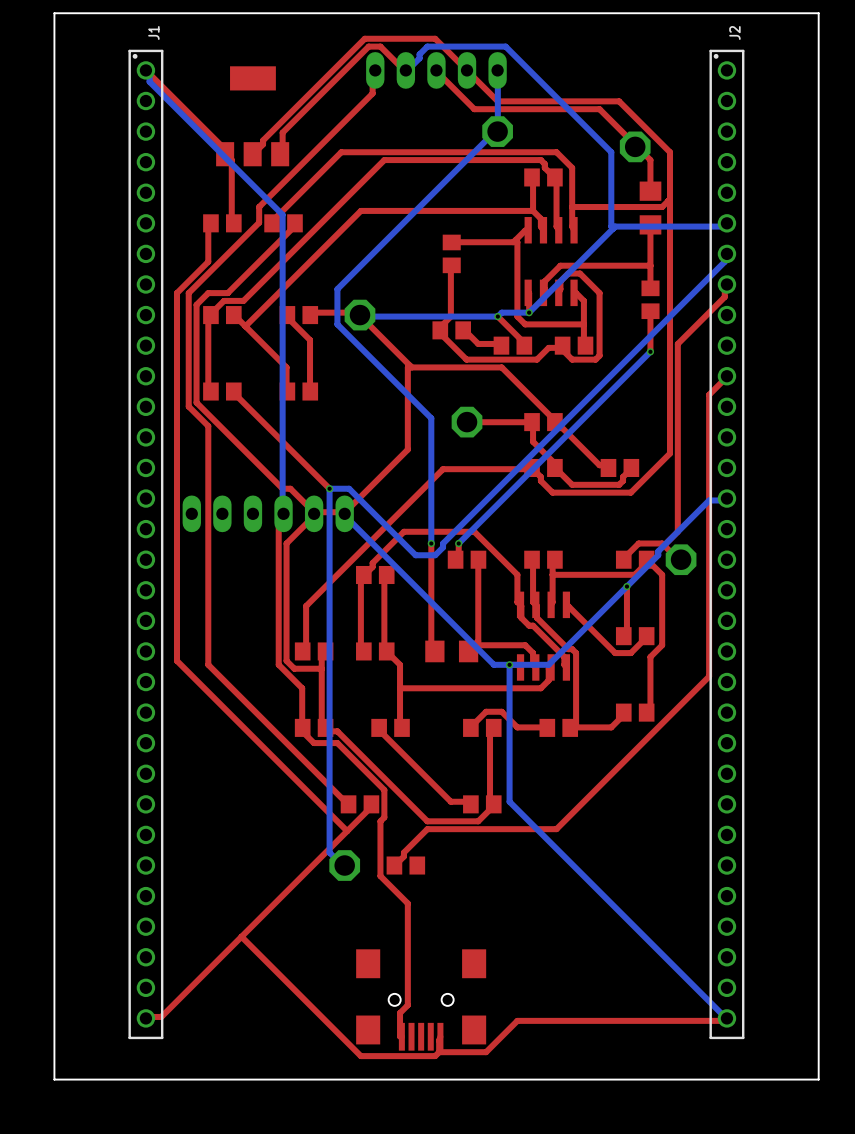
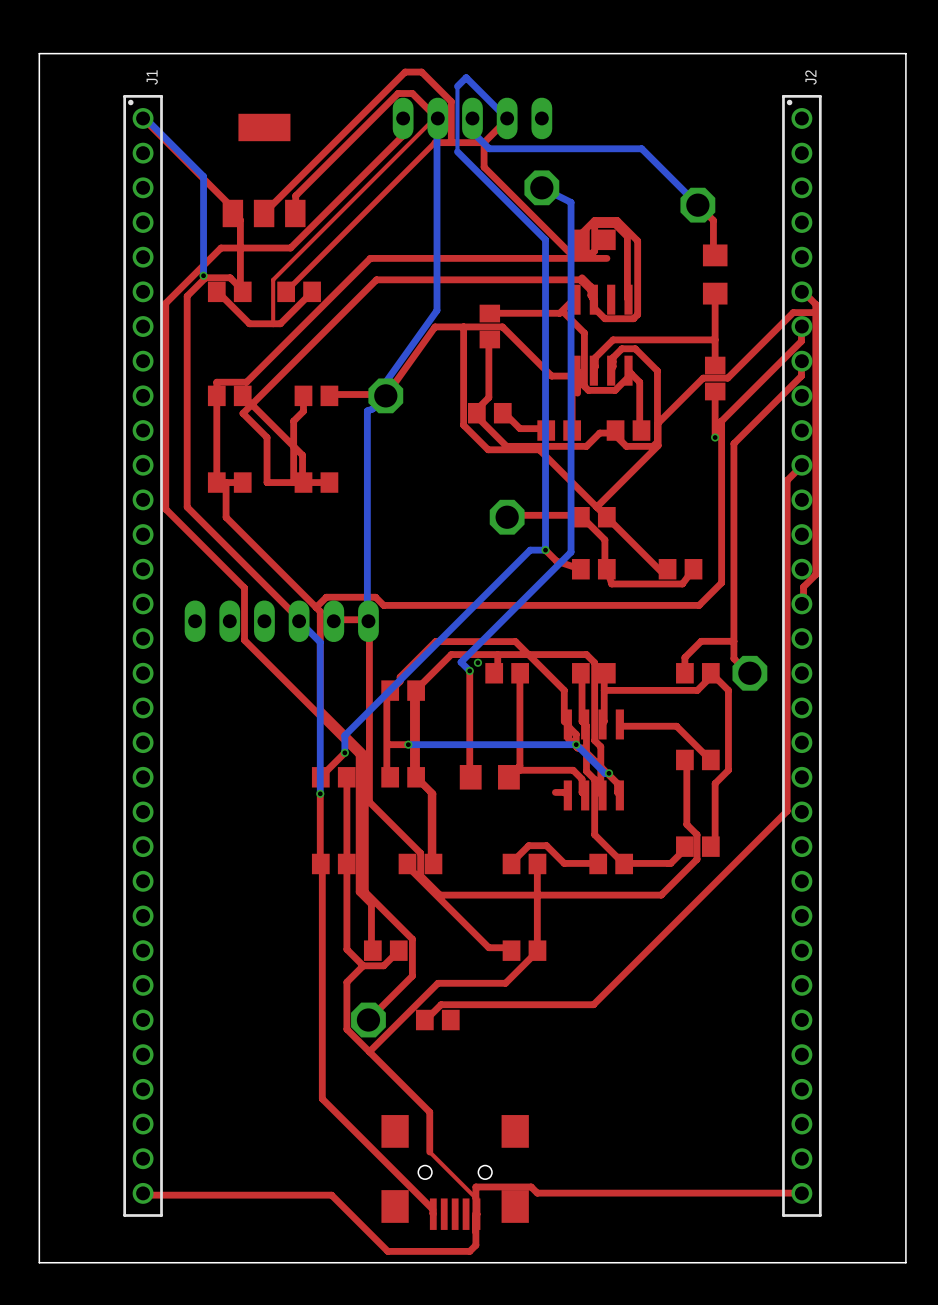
bottom track: (145, 70) (149, 73) (149, 81) (282, 214) (283, 513) -> (143, 118) (145, 118) (203, 176) (203, 275)
top track: (375, 70) (372, 73) (372, 93) (259, 207) (259, 222) (188, 293) (188, 406) (208, 426) (208, 664) (348, 804) -> (403, 118) (402, 136) (290, 248) (221, 248) (165, 303) (165, 509) (244, 587) (244, 640) (359, 754) (359, 892) (371, 904) (372, 950)
top track: (405, 70) (380, 46) (368, 46) (282, 132) (282, 152) (280, 154) -> (273, 323) (273, 279) (432, 120) (437, 118) (412, 93) (398, 93) (295, 195) (295, 213)
bottom track: (405, 70) (419, 58) (419, 54) (427, 46) (505, 46) (611, 152) (611, 226) (613, 228) -> (437, 118) (436, 310) (385, 382) (385, 395) (372, 408) (367, 410) (368, 621)
top track: (436, 70) (474, 109) (599, 109) (650, 160) (650, 191) -> (697, 205) (713, 220) (713, 255) (715, 255)
bottom track: none -> (472, 118) (472, 131) (489, 148) (641, 148) (697, 205)
top track: none -> (507, 118) (484, 142)
bottom track: none -> (507, 118) (466, 77) (457, 86) (457, 151) (545, 239) (545, 550) (530, 550) (344, 735) (344, 752)
bottom track: (497, 70) (497, 131) (493, 132) (337, 289) (337, 324) (431, 418) (431, 543) -> none
top track: none -> (484, 142) (484, 167) (570, 253) (592, 253) (594, 251) (594, 226) (596, 224) (615, 224) (627, 236) (628, 299)
bottom track: none -> (541, 187) (571, 202) (571, 552) (461, 662) (469, 670)
top track: (252, 154) (263, 144) (263, 140) (364, 38) (435, 38) (497, 101) (619, 101) (670, 152) (670, 199) (662, 207) (572, 207) -> (264, 213) (405, 72) (421, 72) (451, 101) (451, 142)
top track: (532, 177) (533, 210) (360, 210) (245, 326) -> (580, 239) (582, 232) (594, 220) (617, 220) (637, 240) (637, 314) (633, 318) (604, 318) (594, 308) (592, 292) (580, 279) (376, 279) (242, 413) (267, 437) (267, 482) (329, 482)
top track: (668, 201) (670, 203) (670, 453) (630, 492) (552, 492) (532, 467) (443, 469) (306, 606) (306, 649) (302, 651) -> (344, 752) (320, 777)
via: none -> (203, 275)
top track: none -> (205, 277) (230, 277) (242, 291)
top track: none -> (205, 277) (187, 296) (187, 507) (299, 619) (299, 621)
top track: (210, 223) (208, 226) (208, 261) (176, 293) (176, 660) (347, 831) -> none
top track: (272, 223) (341, 152) (556, 152) (572, 167) (572, 226) (574, 230) -> (286, 291) (434, 142) (484, 142)
top track: (294, 223) (294, 226) (227, 293) (208, 293) (196, 304) (196, 402) (282, 488) (290, 488) (314, 513) -> (312, 291) (280, 323) (249, 323) (216, 291)
top track: none -> (801, 291) (815, 304) (815, 574) (803, 586) (803, 603) (801, 603)
bottom track: (726, 223) (724, 226) (615, 226) (529, 312) (501, 312) (497, 316) (359, 315) -> none
top track: (558, 230) (556, 226) (556, 179) (544, 167) (544, 163) (540, 160) (384, 160) (243, 300) (223, 300) (208, 316) (208, 390) (210, 391) -> (606, 258) (370, 258) (246, 382) (216, 382) (216, 482)
top track: (515, 240) (517, 242) (517, 316) (525, 324) (583, 324) -> none
top track: none -> (815, 312) (793, 312) (727, 378) (703, 378) (658, 423) (658, 445) (596, 507)
top track: none -> (801, 326) (801, 341) (721, 421) (721, 582) (699, 605) (383, 605) (375, 597) (326, 597) (316, 607)
bottom track: (726, 253) (724, 253) (724, 261) (443, 543) (443, 547) (435, 555) (415, 555) (349, 488) (329, 488) (329, 852) (344, 865) -> none
top track: (726, 284) (724, 285) (724, 297) (677, 343) (677, 531) (664, 545) -> (801, 361) (801, 376) (733, 443) (733, 658) (748, 672)
top track: (574, 292) (583, 303) -> (563, 312) (584, 333) (584, 386) (588, 390) (615, 390) (631, 374) (628, 370) (639, 382)
via: (529, 312) -> none
top track: (287, 315) (286, 316) (310, 340) (310, 391) -> (303, 395) (303, 411) (293, 421) (293, 482)
top track: (310, 315) (313, 312) (356, 312) (411, 367) (501, 367) (599, 465) (607, 465) (608, 467) -> (463, 326) (463, 425) (488, 449) (539, 449) (662, 572) (667, 569)
top track: (497, 316) (521, 340) (521, 343) (524, 345) -> (329, 395) (385, 395) (435, 326) (502, 326) (551, 376) (572, 376) (572, 430)
via: (497, 316) -> none
bottom track: (650, 351) (458, 543) -> none
top track: (409, 365) (407, 367) (407, 449) (344, 513) (341, 512) (314, 513) -> none
top track: (726, 376) (709, 394) (709, 676) (556, 829) (427, 829) (403, 852) (403, 856) (394, 865) -> (801, 465) (787, 480) (787, 811) (593, 1004) (441, 1004) (424, 1020)
top track: (233, 391) (329, 488) -> (242, 482) (226, 482) (226, 517) (320, 611) (320, 709) (365, 754) (365, 892) (412, 939) (412, 976) (368, 1020)
top track: (467, 422) (533, 422) (533, 441) (556, 465) (554, 467) (572, 484) (619, 484) (631, 467) -> (507, 517) (507, 515) (580, 515) (604, 539) (604, 567) (611, 583) (682, 583) (693, 569)
top track: none -> (545, 550) (556, 561) (580, 569)
via: none -> (545, 550)
via: (329, 488) -> none
bottom track: (726, 498) (724, 500) (709, 500) (658, 551) (658, 555) (548, 664) (493, 664) (344, 513) -> none
top track: (283, 513) (278, 520) (278, 664) (302, 688) -> (320, 793) (320, 819)
bottom track: none -> (299, 621) (320, 642) (320, 793)
top track: (314, 513) (286, 543) (286, 660) (294, 668) (321, 668) -> (333, 621) (367, 619) (369, 621) (369, 802) (420, 853) (420, 875) (439, 895) (661, 895) (697, 859) (697, 834) (686, 824) (686, 761) (684, 759)
top track: (431, 543) (431, 649) (434, 651) -> (469, 670) (470, 777)
via: (431, 543) -> none
via: (458, 543) -> none
via: none -> (477, 662)
via: none -> (469, 670)
top track: (679, 559) (662, 543) (638, 543) (626, 555) (626, 559) (623, 559) -> (733, 641) (701, 641) (684, 657) (684, 673)
top track: (626, 586) (626, 633) (623, 636) -> none
via: (626, 586) -> none
top track: none -> (567, 724) (576, 734) (576, 744)
top track: (566, 604) (615, 653) (630, 653) (646, 636) -> (619, 724) (621, 726) (676, 726) (710, 759)
top track: (536, 617) (568, 649) (572, 649) (576, 653) (576, 727) (570, 727) (572, 727) -> (586, 739) (586, 771) (594, 779) (594, 834) (623, 863) (626, 863)
top track: none -> (408, 744) (389, 744)
bottom track: none -> (408, 744) (576, 744) (604, 773) (609, 773)
via: none -> (408, 744)
via: none -> (576, 744)
via: none -> (344, 752)
via: none -> (609, 773)
top track: (325, 651) (321, 653) (321, 727) (325, 727) (325, 731) (337, 731) (427, 821) (478, 821) (490, 809) (490, 805) (493, 804) (490, 801) (490, 731) (493, 727) -> (346, 777) (346, 949) (363, 965)
bottom track: (509, 664) (509, 801) (726, 1018) -> none
via: (509, 664) -> none
via: none -> (320, 793)
top track: (551, 667) (548, 668) (548, 680) (540, 688) (400, 688) -> (602, 795) (600, 793) (600, 746) (594, 740) (594, 662) (586, 654) (451, 654) (416, 690) (416, 777) (432, 793) (433, 863)
top track: (302, 727) (302, 731) (313, 743) (337, 743) (384, 790) (384, 817) (380, 821) (380, 876) (407, 903) (407, 1005) (400, 1013) (400, 1036) (401, 1036) -> (320, 863) (322, 1098) (432, 1209) (433, 1214)
top track: none -> (537, 863) (537, 951) (505, 983) (437, 983) (369, 1051)
top track: (371, 804) (368, 805) (368, 809) (161, 1016) (145, 1018) -> (398, 950) (383, 965) (363, 965)
top track: none -> (363, 965) (346, 982) (346, 1029) (429, 1112) (429, 1152) (475, 1198)
top track: (241, 936) (360, 1056) (435, 1056) (439, 1052) (486, 1052) (517, 1020) (724, 1020) (726, 1018) -> (143, 1193) (144, 1195) (331, 1195) (387, 1251) (469, 1251) (475, 1245) (475, 1186) (531, 1186) (537, 1193) (801, 1193)

